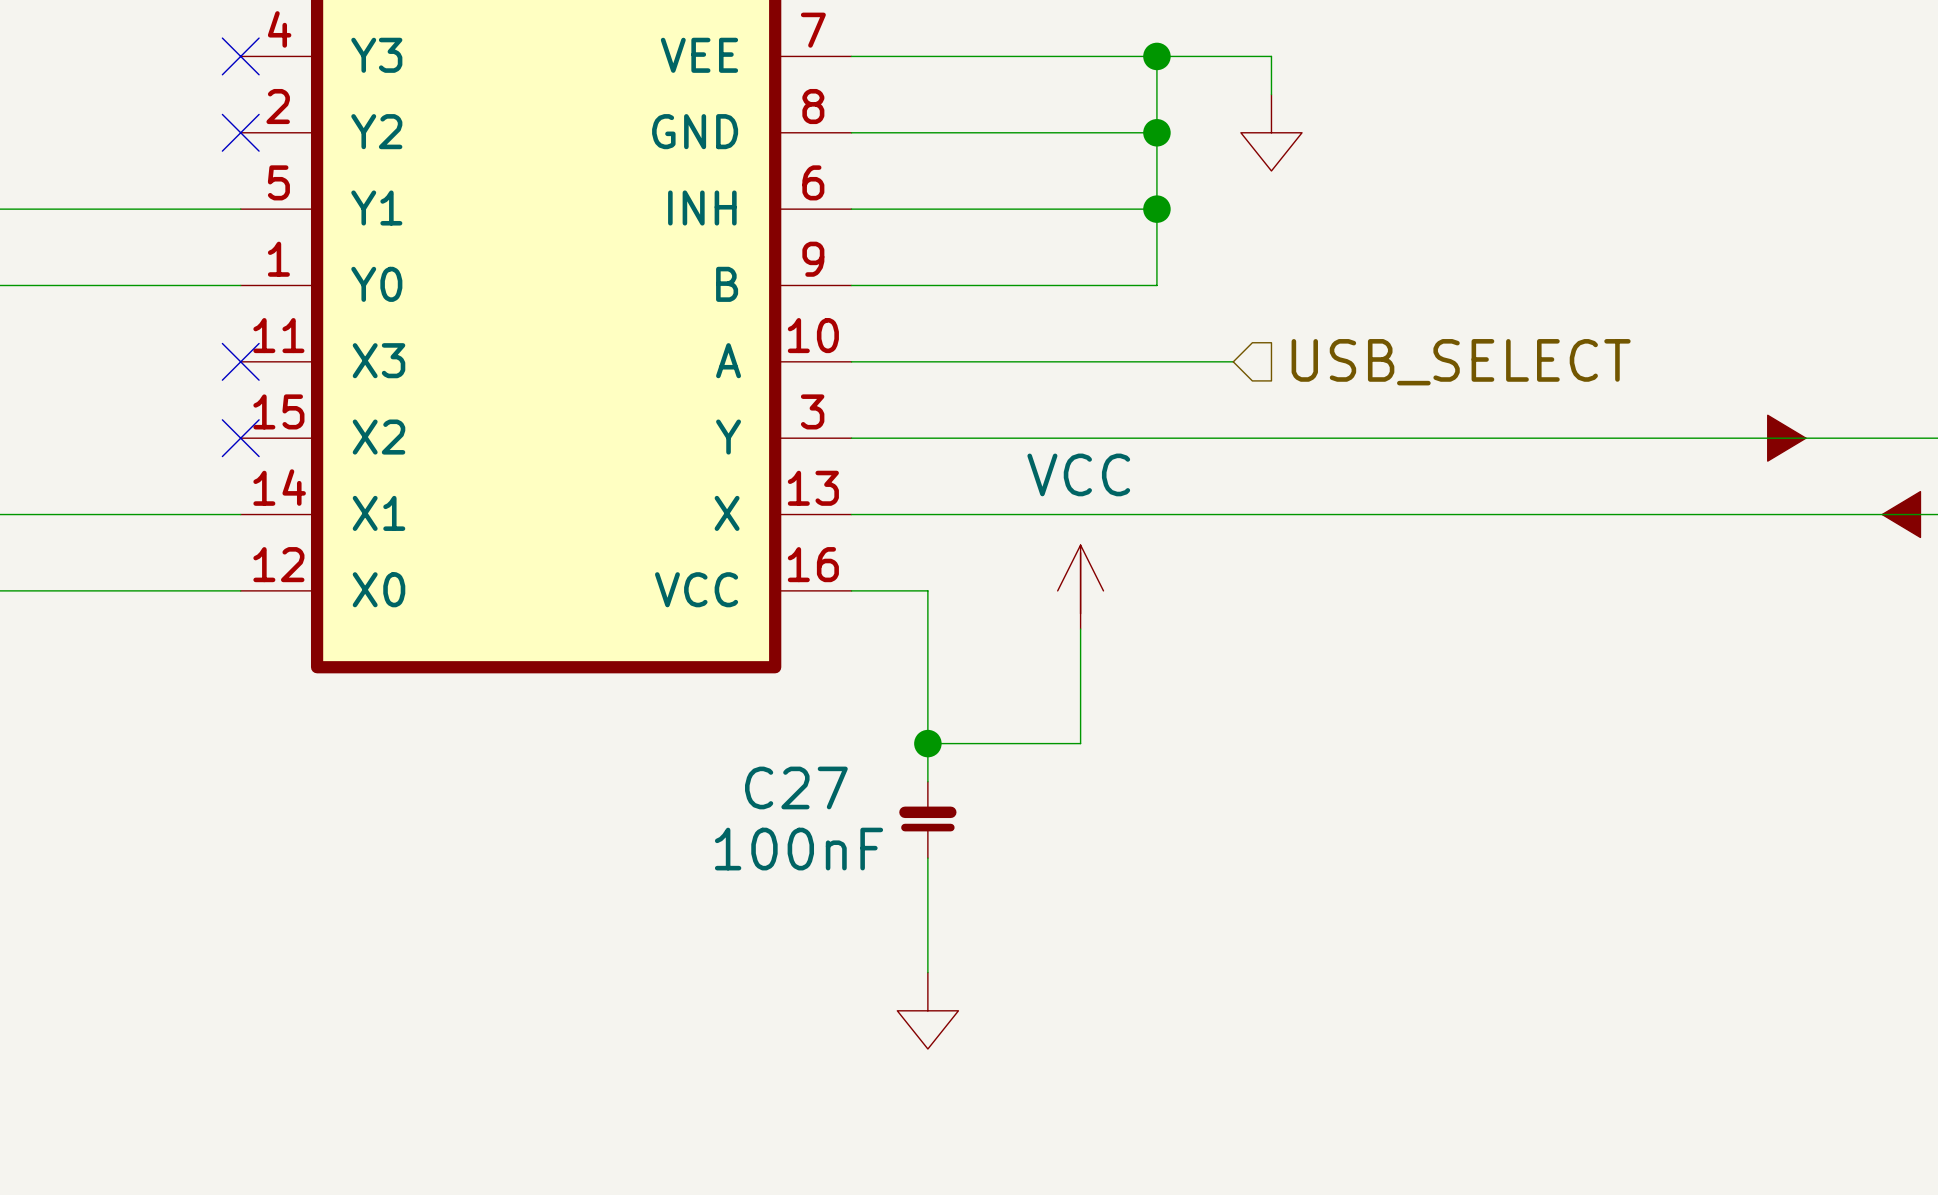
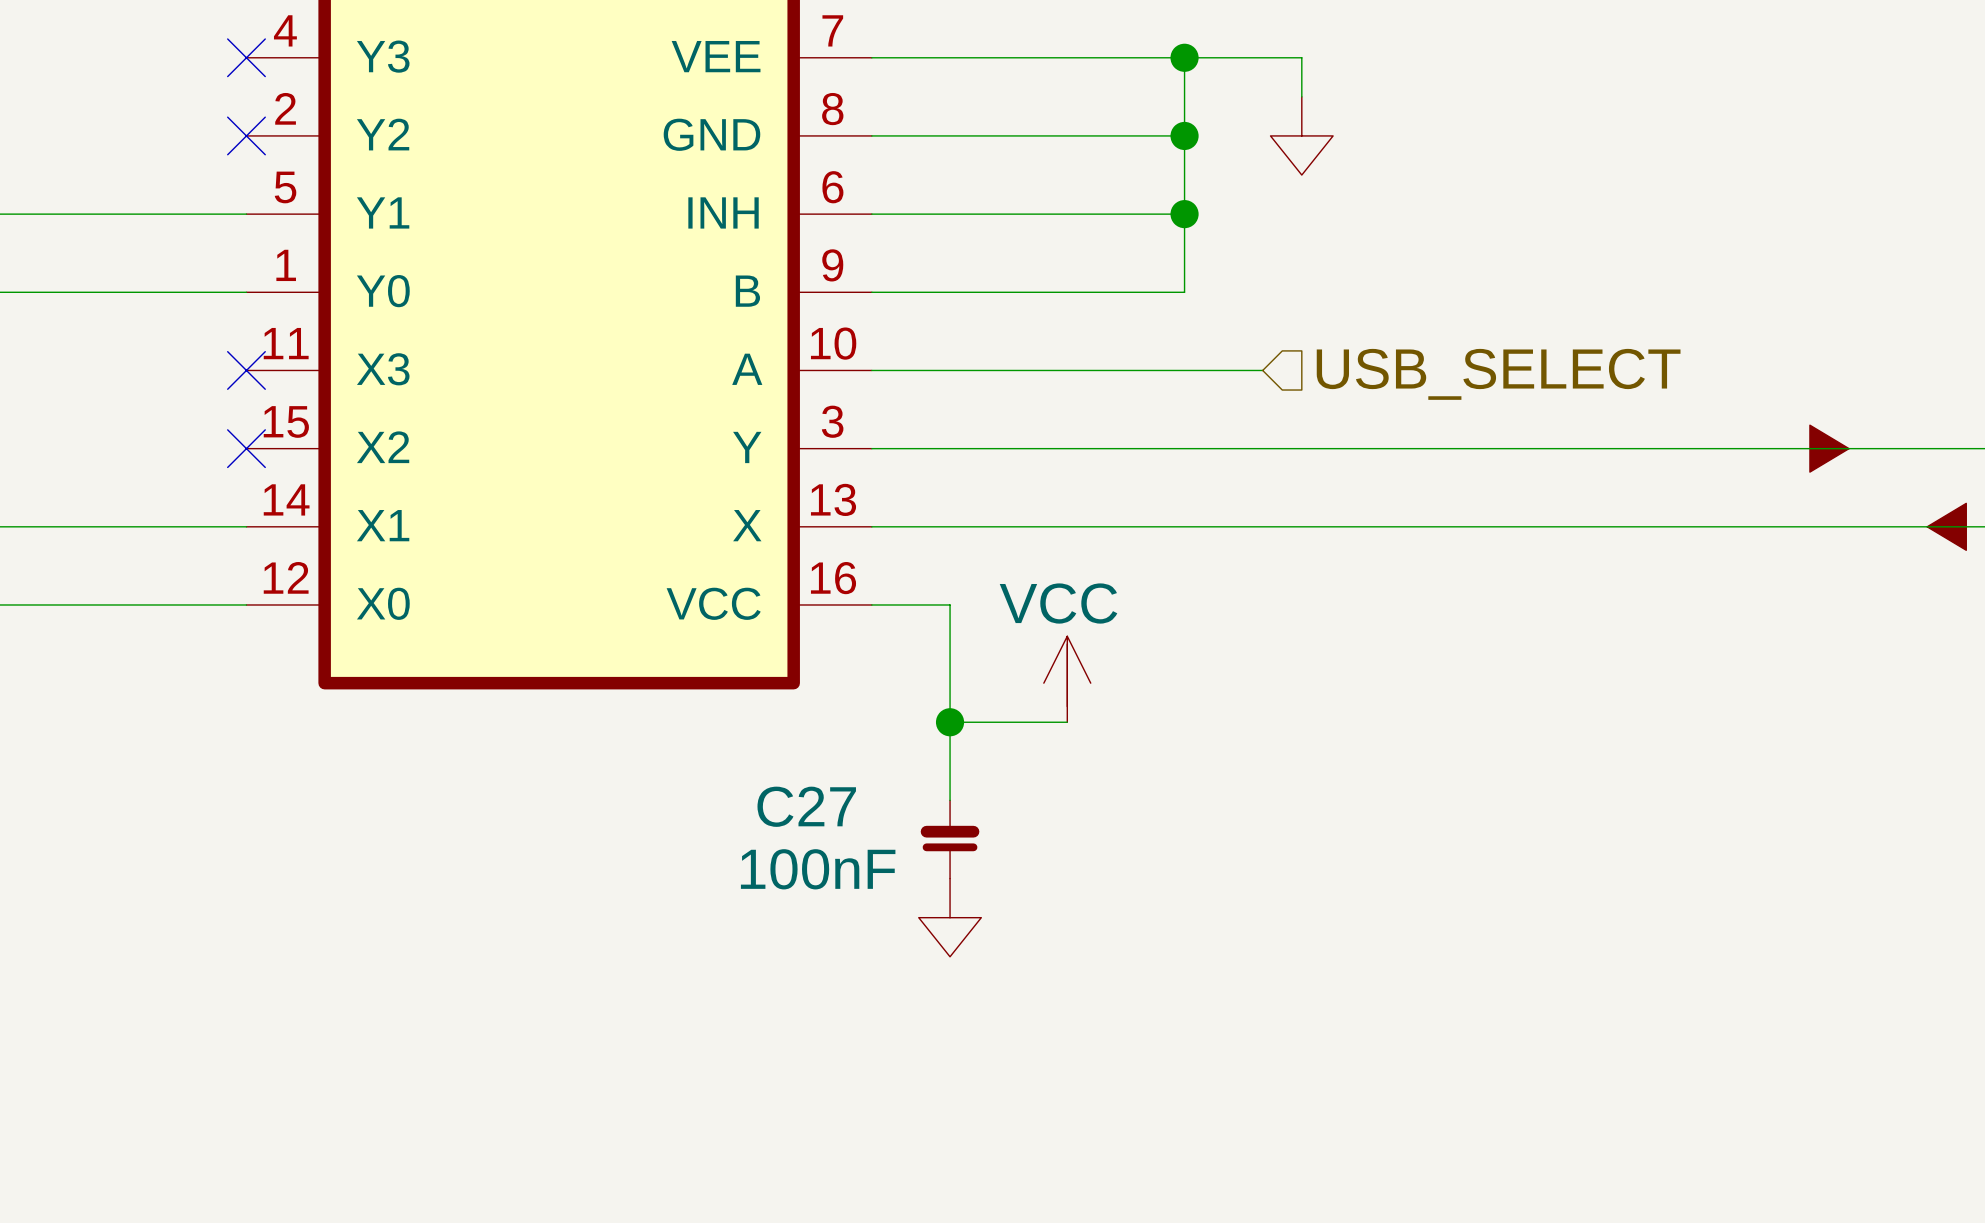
power symbol text position: VCC (1078, 474) -> VCC (1058, 603)
power symbol position: VCC (1080, 587) -> VCC (1067, 679)
wire: (1080, 629) (1080, 743) (927, 743) -> none
wire: none -> (950, 722) (1067, 722)
junction position: (927, 743) -> (950, 722)
wire: (927, 858) (927, 972) -> none
power symbol position: (927, 1010) -> (950, 917)

